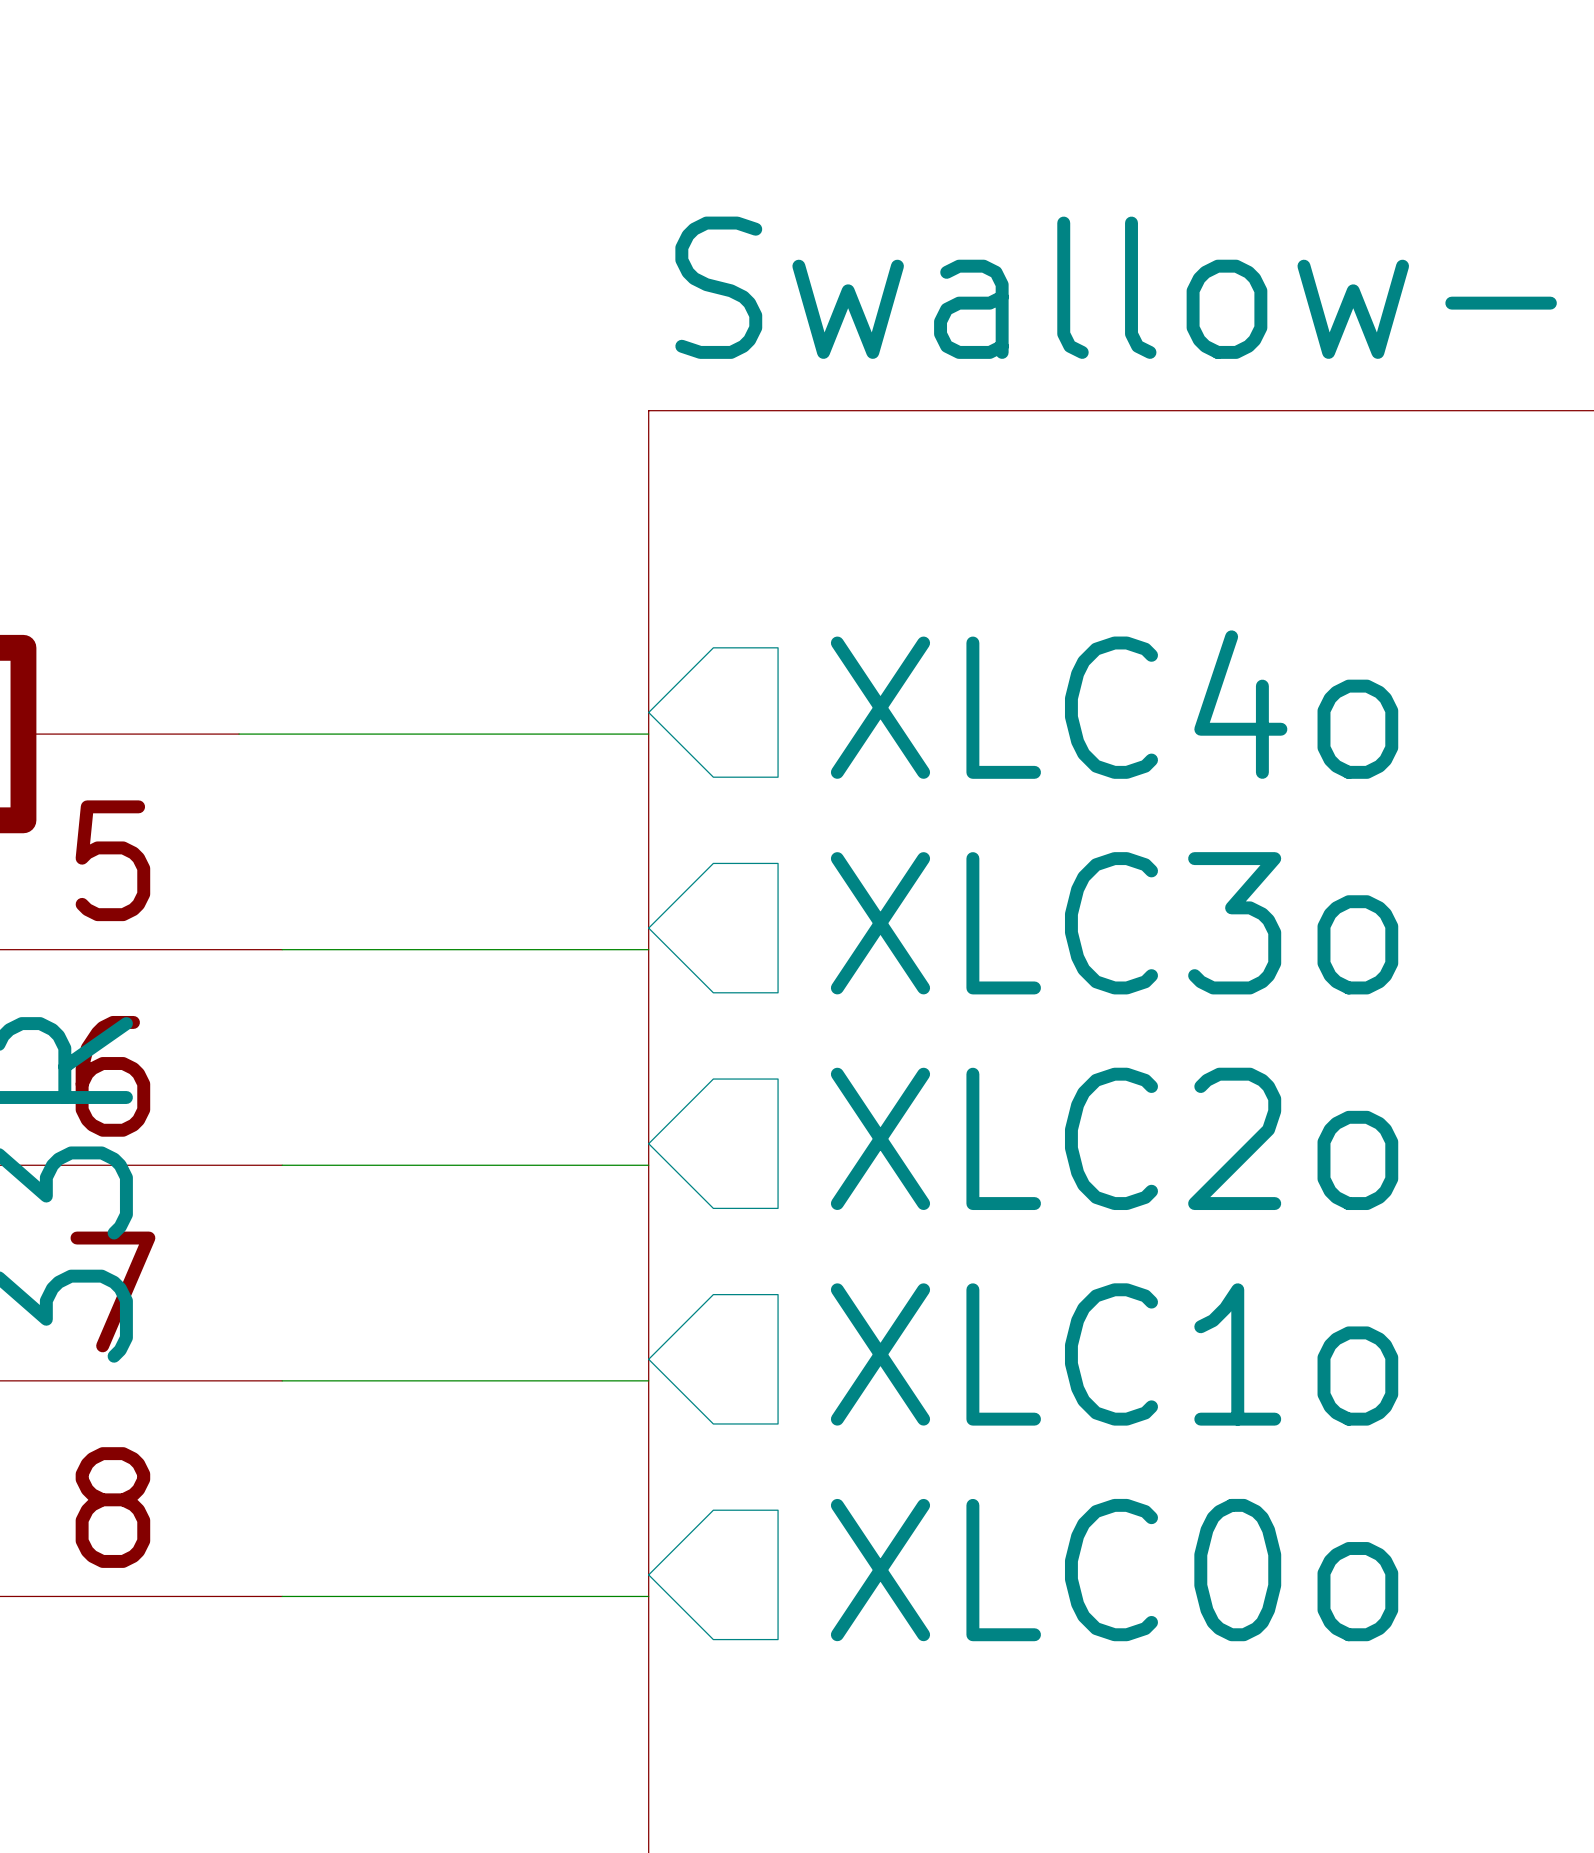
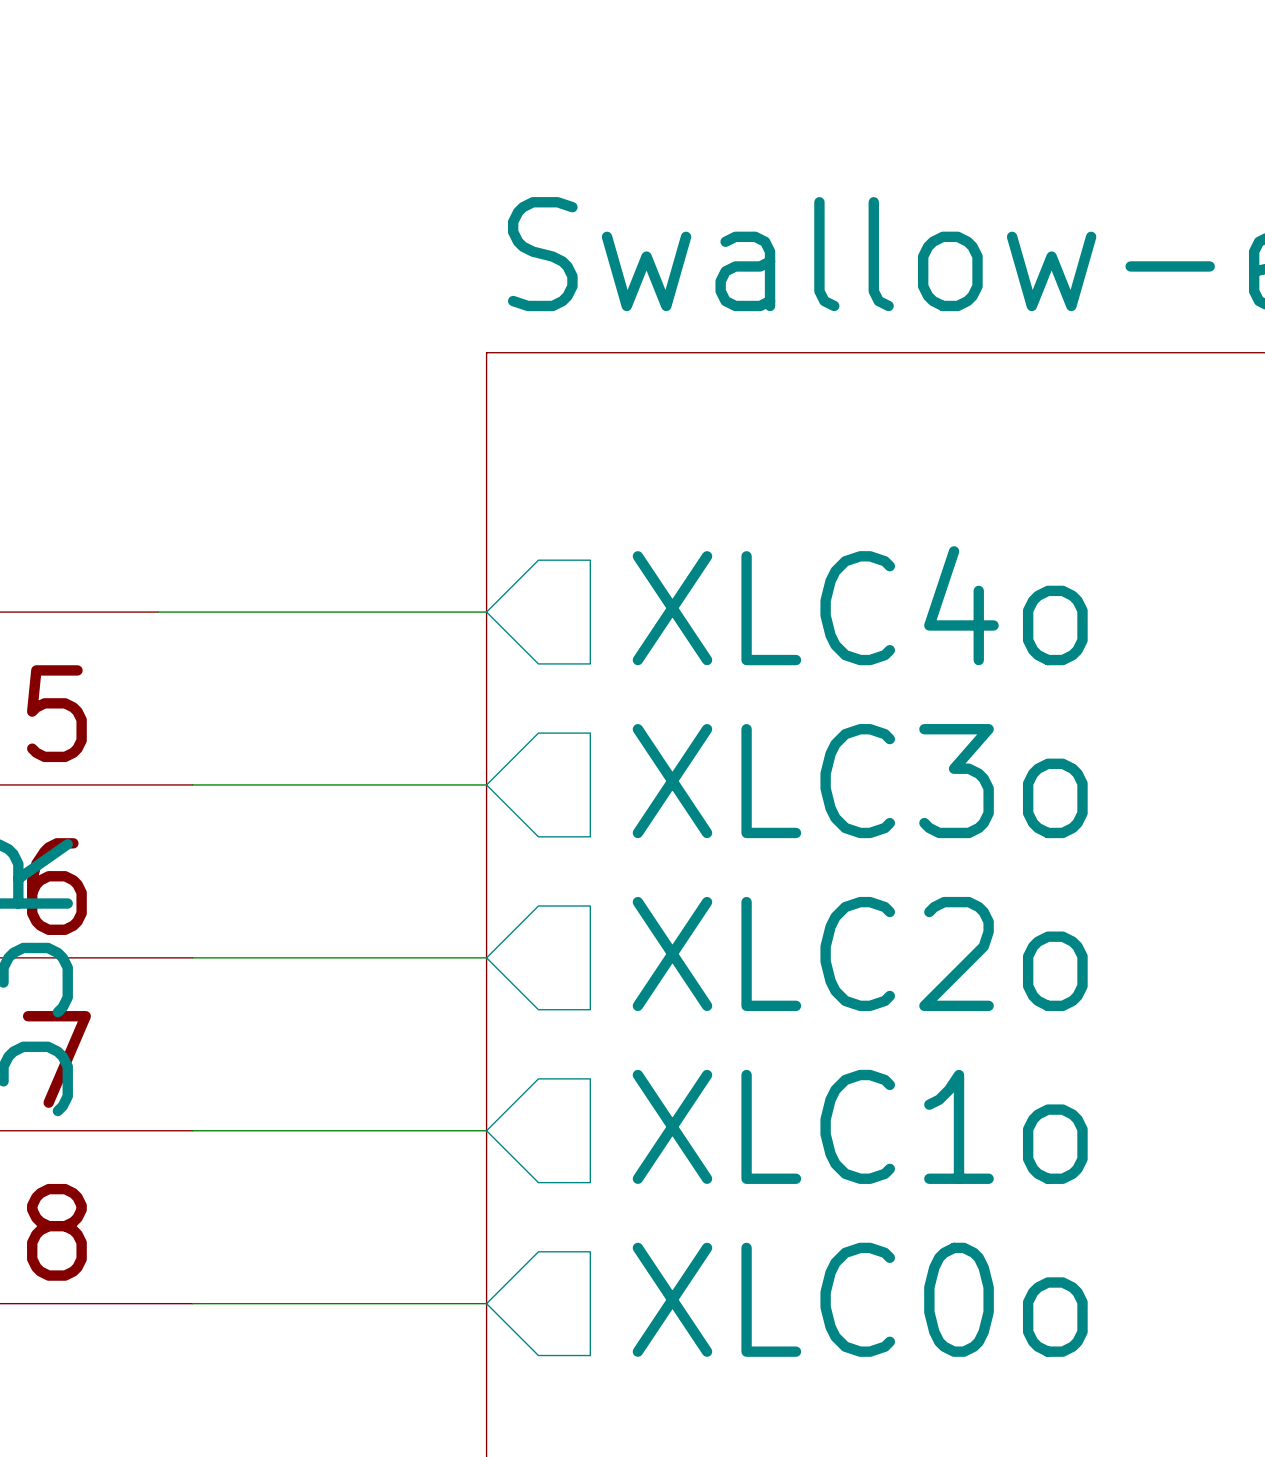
sheet pin position: XLC4o (1114, 704) -> XLC4o (860, 605)
sheet pin position: XLC3o (1114, 923) -> XLC3o (860, 781)
sheet pin position: XLC2o (1114, 1138) -> XLC2o (860, 953)
sheet pin position: XLC1o (1114, 1354) -> XLC1o (860, 1126)
sheet pin position: XLC0o (1114, 1570) -> XLC0o (860, 1299)

